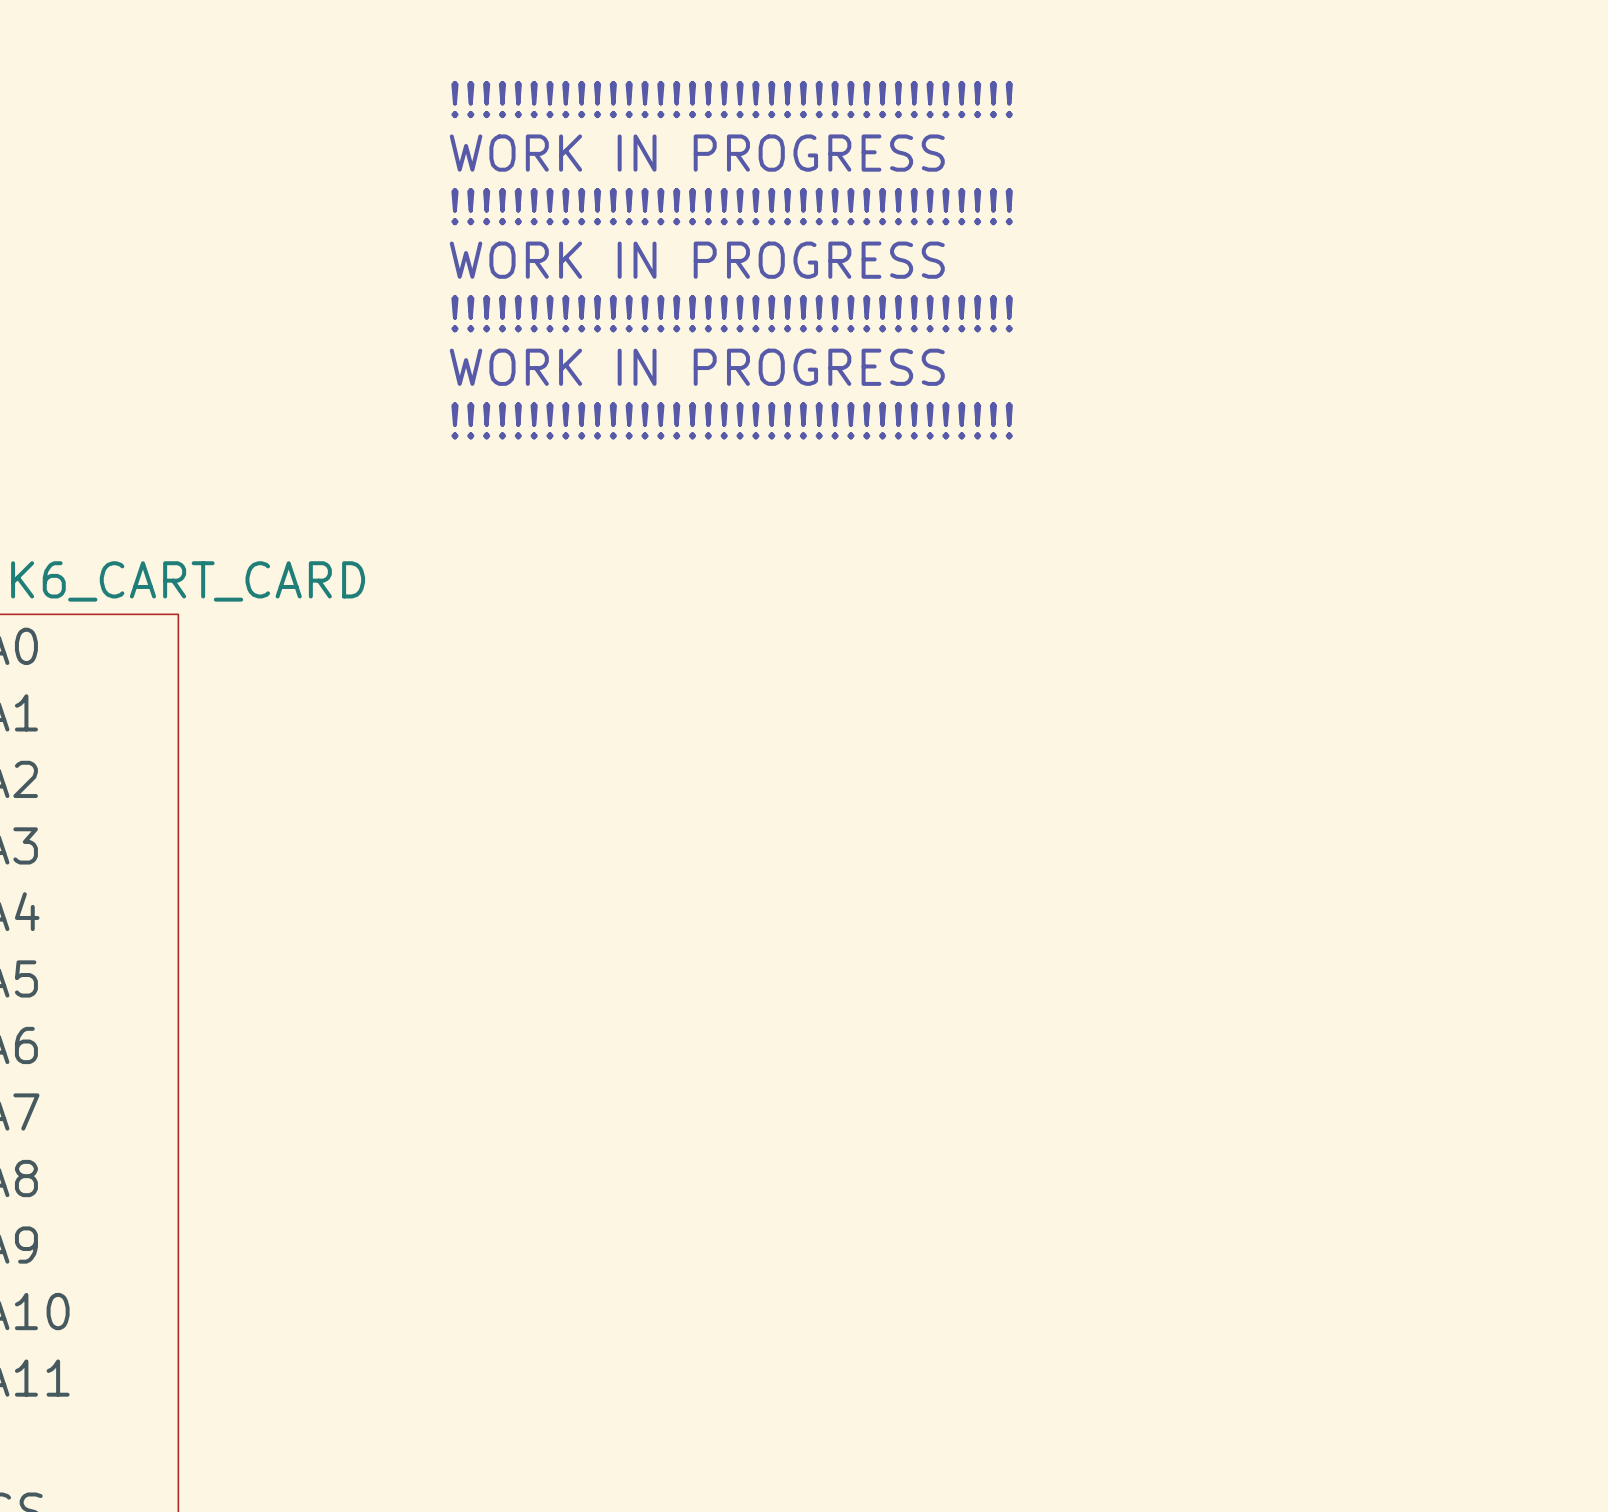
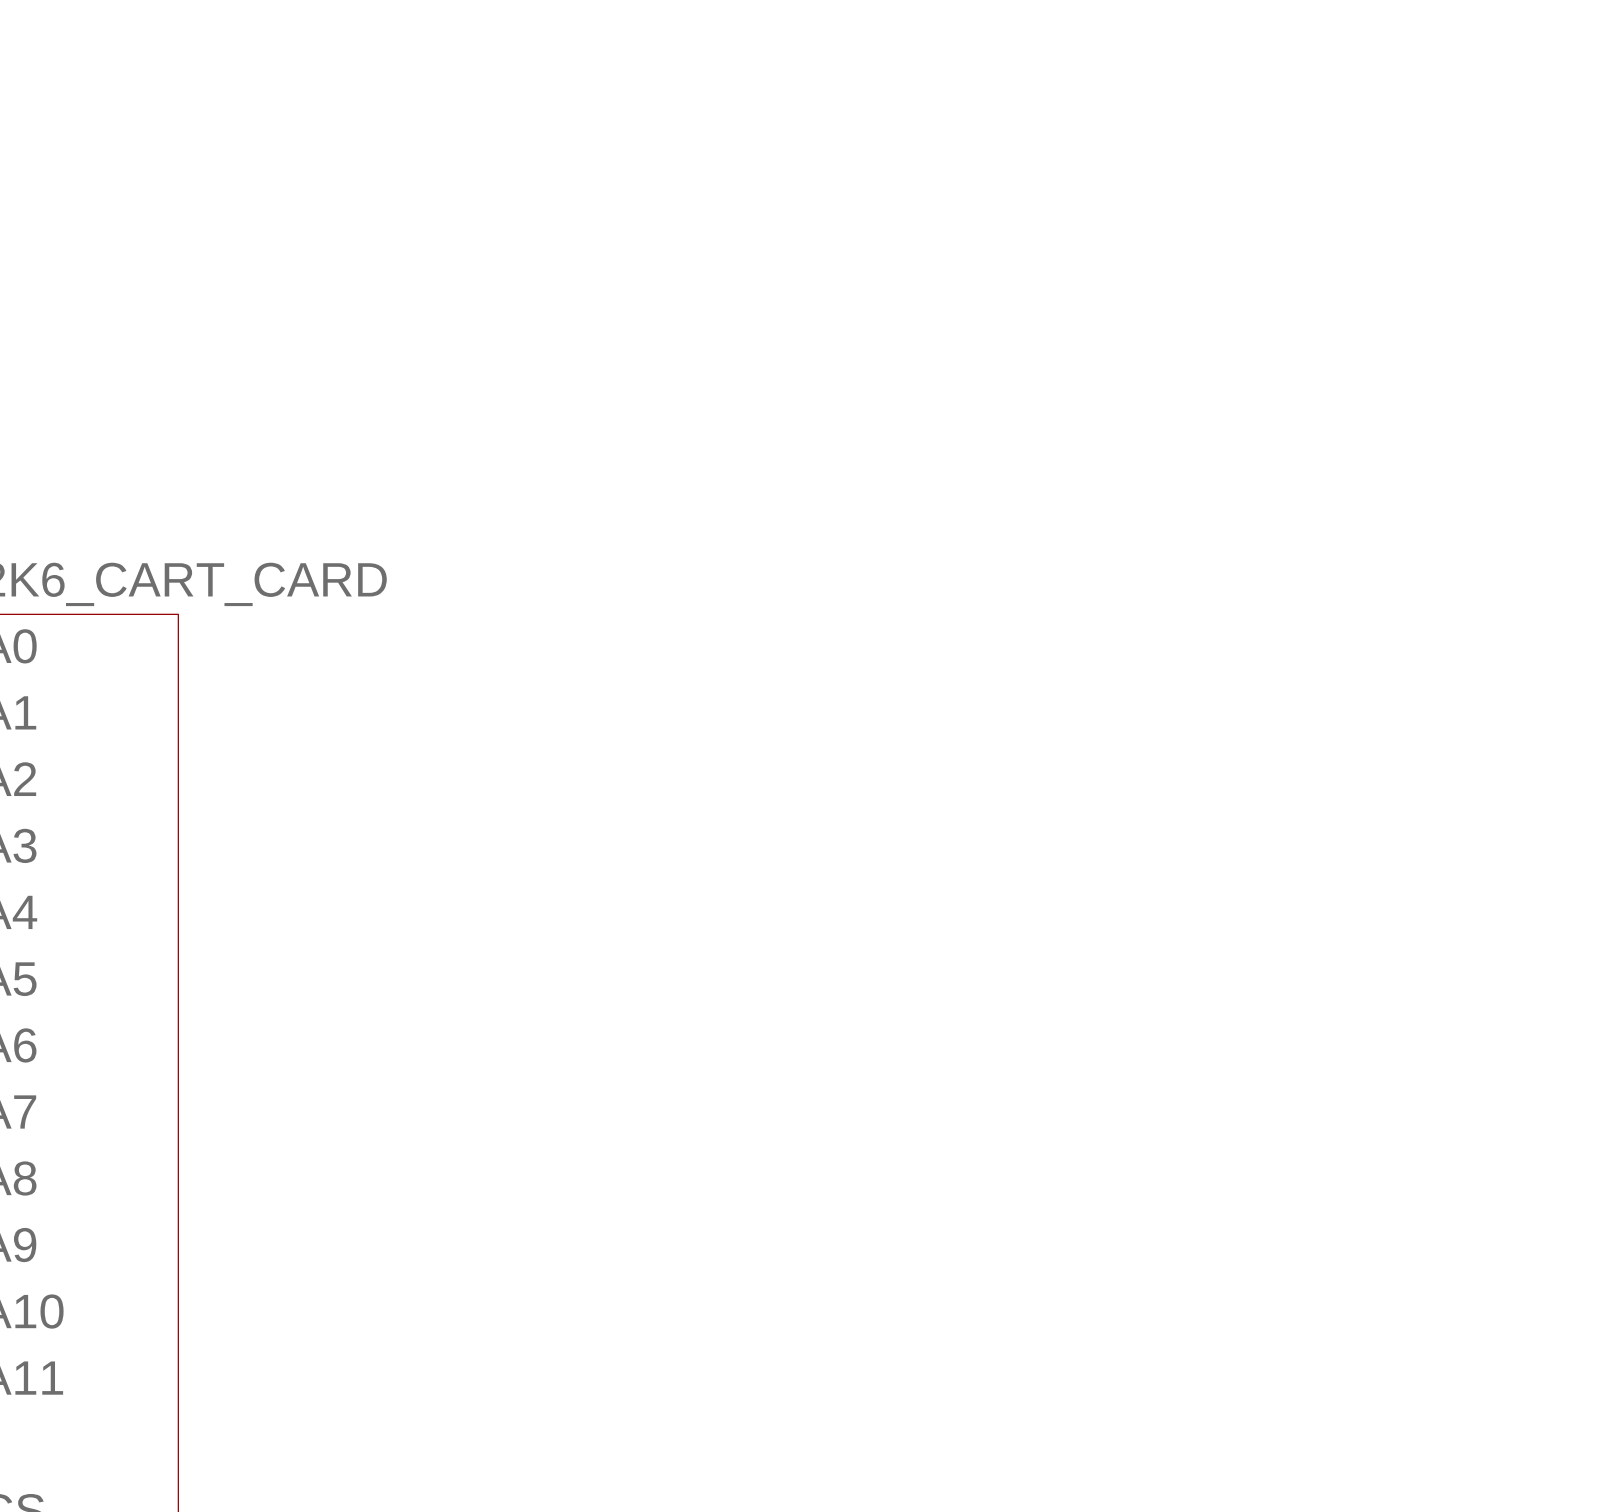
text: !!!!!!!!!!!!!!!!!!!!!!!!!!!!!!!!!!!! (732, 99) -> none
text: WORK IN PROGRESS (697, 153) -> none
text: !!!!!!!!!!!!!!!!!!!!!!!!!!!!!!!!!!!! (732, 206) -> none
text: WORK IN PROGRESS (697, 260) -> none
text: !!!!!!!!!!!!!!!!!!!!!!!!!!!!!!!!!!!! (732, 313) -> none
text: WORK IN PROGRESS (697, 367) -> none
text: !!!!!!!!!!!!!!!!!!!!!!!!!!!!!!!!!!!! (732, 420) -> none

